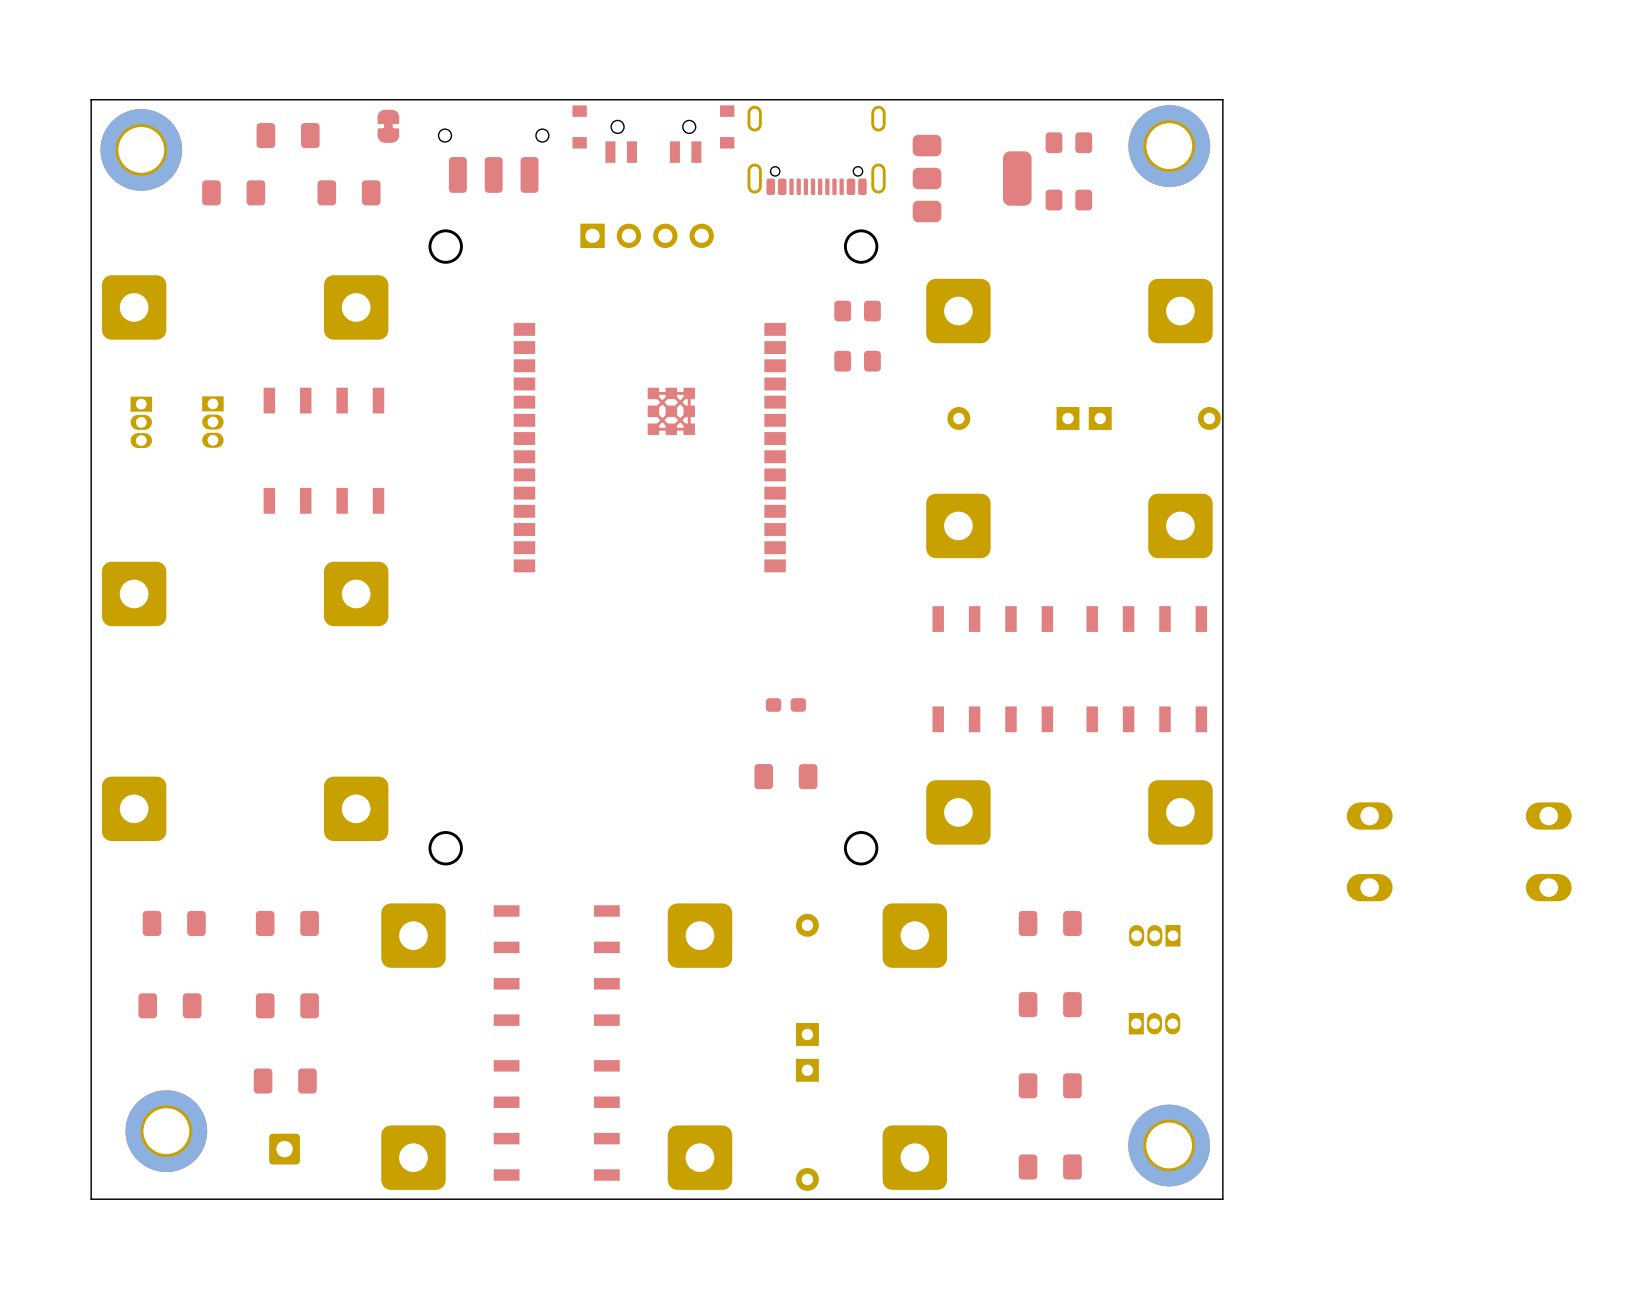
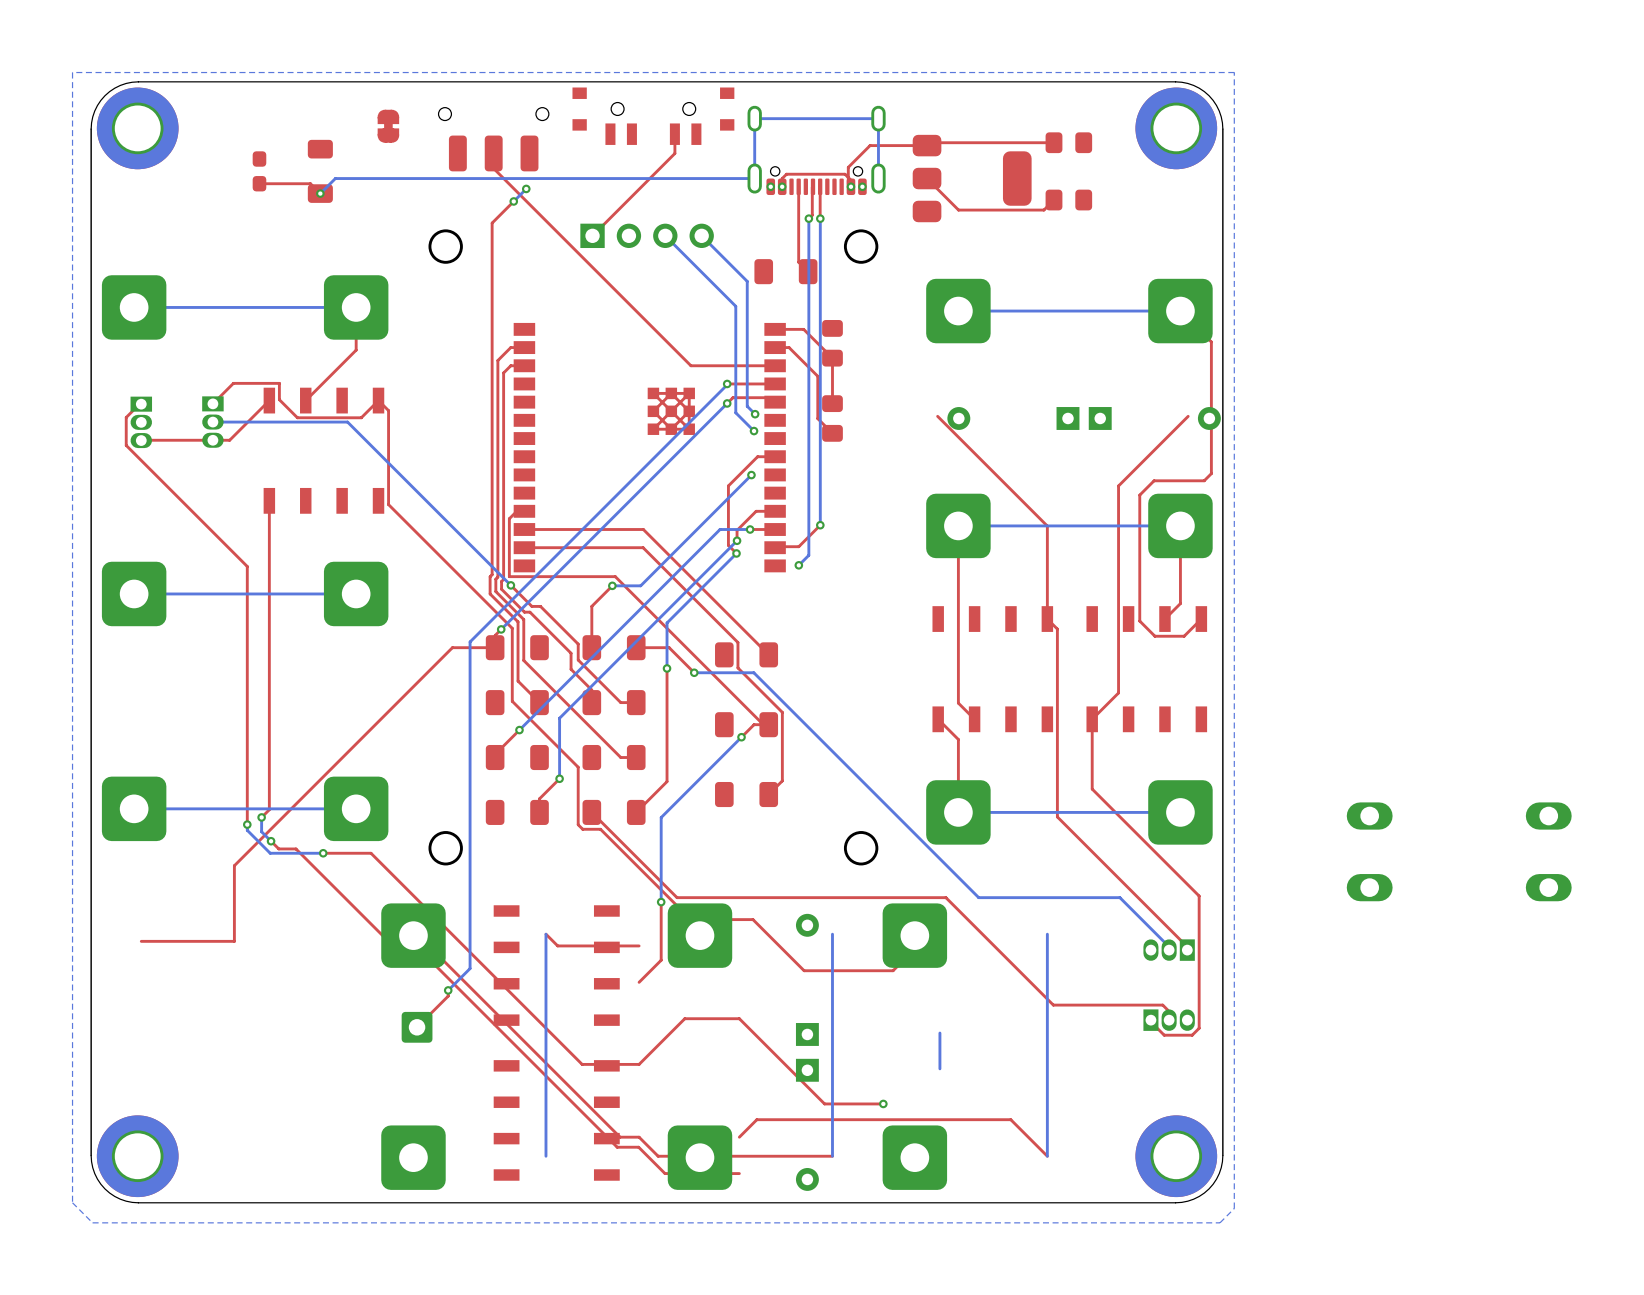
bottom zone outline: none -> (1234, 72) (72, 72) (72, 1202) (92, 1222) (1219, 1222) (1234, 1208) (1234, 72)
board edge: (1222, 129) (1222, 99) (91, 99) (91, 129) -> (1222, 129) (1219, 111) (1209, 95) (1193, 85) (1175, 81) (138, 81) (120, 85) (105, 95) (94, 111) (91, 129)
part position: (653, 134) -> (653, 116)
top track: none -> (674, 134) (674, 153) (592, 235)
part: (288, 135) -> none
top track: none -> (1053, 142) (929, 142) (927, 145) (870, 145) (848, 167) (848, 184) (850, 186) (850, 180) (844, 174) (786, 174) (782, 178) (782, 186)
part position: (1169, 146) -> (1176, 128)
part position: (141, 149) -> (137, 128)
top track: none -> (493, 153) (493, 168) (690, 365) (775, 365)
part position: (493, 160) -> (493, 139)
part: none -> (259, 171)
part: none -> (320, 171)
bottom track: none -> (878, 178) (878, 118) (754, 118) (754, 178) (335, 178) (320, 193)
top track: none -> (927, 178) (958, 210) (1043, 210) (1053, 200)
top track: none -> (259, 183) (310, 183) (320, 193)
via: none -> (770, 186)
via: none -> (782, 186)
top track: none -> (798, 186) (798, 262) (808, 271)
top track: none -> (813, 186) (812, 215) (808, 218)
top track: none -> (820, 186) (820, 218)
via: none -> (850, 186)
via: none -> (862, 186)
bottom track: none -> (526, 188) (513, 201)
via: none -> (526, 188)
part: (233, 192) -> none
part: (349, 192) -> none
via: none -> (320, 193)
top track: none -> (513, 201) (492, 223) (492, 574) (490, 576) (490, 593) (518, 621) (518, 681) (539, 702)
via: none -> (513, 201)
bottom track: none -> (808, 218) (808, 555) (798, 565)
via: none -> (808, 218)
bottom track: none -> (820, 218) (820, 525)
via: none -> (820, 218)
bottom track: none -> (665, 235) (735, 306) (735, 412) (754, 431)
bottom track: none -> (701, 235) (747, 281) (747, 406) (755, 414)
part: none -> (785, 271)
top track: none -> (356, 307) (356, 350) (305, 400)
bottom track: none -> (356, 307) (134, 307)
part: (857, 311) -> none
top track: none -> (1180, 311) (1211, 341) (1211, 473) (1204, 480) (1154, 480) (1139, 495) (1139, 621) (1154, 636) (1184, 636) (1201, 619)
bottom track: none -> (1180, 311) (958, 311)
top track: none -> (775, 329) (803, 329) (832, 358) (832, 403)
part: none -> (832, 343)
top track: none -> (524, 347) (510, 347) (497, 360) (497, 577) (495, 579) (495, 591) (523, 619) (523, 660) (620, 757) (636, 757)
top track: none -> (775, 347) (789, 347) (817, 376) (817, 418) (832, 433)
part: (857, 361) -> none
top track: none -> (524, 365) (510, 365) (503, 372) (503, 579) (501, 581) (501, 589) (524, 612) (529, 612) (571, 653) (571, 669) (591, 690) (591, 702)
bottom track: none -> (727, 383) (470, 641) (470, 968) (448, 990)
via: none -> (727, 383)
top track: none -> (775, 383) (727, 383)
top track: none -> (269, 400) (229, 440) (141, 440)
top track: none -> (775, 402) (770, 397) (732, 397) (727, 403)
top track: none -> (212, 403) (233, 383) (279, 383) (279, 399) (297, 417) (361, 417) (378, 400) (388, 410) (388, 504) (512, 628) (512, 701) (578, 767) (578, 824) (582, 829) (600, 829) (690, 919) (752, 919) (804, 970) (893, 970) (939, 923)
bottom track: none -> (727, 403) (501, 629)
via: none -> (727, 403)
top track: none -> (141, 404) (126, 417) (126, 445) (247, 566) (247, 824)
via: none -> (755, 414)
top track: none -> (937, 416) (1047, 526) (1047, 619) (1057, 629) (1057, 816) (1187, 946) (1187, 950)
top track: none -> (1188, 416) (1118, 485) (1118, 692) (1092, 719) (1092, 789) (1199, 896) (1199, 1028) (1192, 1035) (1164, 1035) (1150, 1020)
part: none -> (832, 418)
bottom track: none -> (212, 422) (347, 422) (510, 585)
via: none -> (754, 431)
top track: none -> (775, 456) (757, 456) (728, 485) (728, 545) (736, 553)
bottom track: none -> (751, 475) (640, 585) (612, 585)
via: none -> (751, 475)
top track: none -> (269, 500) (269, 809) (261, 817)
top track: none -> (524, 511) (516, 511) (509, 518) (509, 576) (615, 576) (763, 724)
top track: none -> (775, 511) (756, 511) (737, 530) (737, 540)
top track: none -> (820, 525) (798, 546) (775, 547)
via: none -> (820, 525)
top track: none -> (958, 525) (958, 703) (974, 719)
top track: none -> (1180, 525) (1180, 603) (1164, 619)
bottom track: none -> (1180, 525) (958, 525)
top track: none -> (524, 529) (643, 529) (768, 654)
bottom track: none -> (750, 529) (720, 529) (519, 730)
via: none -> (750, 529)
top track: none -> (775, 529) (750, 529)
bottom track: none -> (737, 540) (559, 718) (559, 778)
via: none -> (737, 540)
top track: none -> (524, 547) (643, 547) (737, 642) (737, 667) (782, 712) (782, 780) (768, 794)
bottom track: none -> (736, 553) (667, 622) (667, 668)
via: none -> (736, 553)
via: none -> (798, 565)
top track: none -> (510, 585) (531, 606) (540, 606) (578, 644) (578, 660) (620, 702) (636, 702)
via: none -> (510, 585)
top track: none -> (612, 585) (591, 606) (591, 647)
via: none -> (612, 585)
bottom track: none -> (356, 593) (134, 593)
top track: none -> (501, 629) (495, 635) (495, 647) (452, 647) (234, 865) (234, 941) (141, 941)
via: none -> (501, 629)
part: none -> (517, 647)
part: none -> (614, 647)
top track: none -> (636, 647) (669, 647) (694, 672)
part: none -> (746, 654)
top track: none -> (667, 668) (667, 781) (636, 812)
via: none -> (667, 668)
bottom track: none -> (694, 672) (753, 672) (978, 897) (1119, 897) (1169, 946) (1169, 950)
via: none -> (694, 672)
part: none -> (517, 702)
part: none -> (614, 702)
part: (785, 704) -> none
top track: none -> (938, 719) (958, 739) (958, 812)
part: none -> (746, 724)
top track: none -> (768, 724) (754, 724) (741, 737)
top track: none -> (519, 730) (495, 754) (495, 757)
via: none -> (519, 730)
bottom track: none -> (741, 737) (661, 817) (661, 902)
via: none -> (741, 737)
part: none -> (517, 757)
part: none -> (614, 757)
part: (785, 776) -> none
top track: none -> (559, 778) (539, 798) (539, 812)
via: none -> (559, 778)
part: none -> (746, 794)
bottom track: none -> (356, 808) (134, 808)
part: none -> (517, 812)
top track: none -> (591, 812) (677, 897) (945, 897) (1053, 1005) (1162, 1005) (1169, 1011) (1169, 1020)
part: none -> (614, 812)
bottom track: none -> (1180, 812) (958, 812)
bottom track: none -> (261, 817) (261, 831) (271, 841)
via: none -> (261, 817)
bottom track: none -> (247, 824) (247, 830) (270, 853) (323, 853)
via: none -> (247, 824)
top track: none -> (271, 841) (278, 848) (296, 848) (407, 959) (429, 959) (617, 1147) (638, 1147) (665, 1173) (739, 1173)
via: none -> (271, 841)
top track: none -> (323, 853) (371, 853) (582, 1064) (639, 1064) (684, 1018) (739, 1018) (824, 1103) (883, 1103)
via: none -> (323, 853)
top track: none -> (661, 902) (661, 960) (639, 982)
via: none -> (661, 902)
part: (174, 923) -> none
part: (287, 923) -> none
part: (1050, 923) -> none
top track: none -> (417, 934) (620, 1137) (639, 1137) (658, 1156) (832, 1156)
top track: none -> (545, 934) (557, 945) (639, 945)
bottom track: none -> (545, 934) (545, 1156)
bottom track: none -> (832, 934) (832, 1156)
bottom track: none -> (1047, 934) (1047, 1156)
part position: (1154, 935) -> (1169, 950)
top track: none -> (448, 990) (448, 996) (417, 1027)
via: none -> (448, 990)
part: (1050, 1004) -> none
part: (169, 1005) -> none
part: (287, 1005) -> none
part position: (1154, 1023) -> (1169, 1020)
part: none -> (417, 1027)
bottom track: none -> (939, 1033) (939, 1068)
part: (285, 1081) -> none
part: (1050, 1085) -> none
via: none -> (883, 1103)
part position: (166, 1131) -> (137, 1156)
top track: none -> (739, 1137) (756, 1119) (1010, 1119) (1047, 1156)
part position: (1169, 1145) -> (1176, 1156)
part: (284, 1149) -> none
board edge: (1222, 1155) (1222, 1199) (91, 1199) (91, 1155) -> (1222, 1155) (1219, 1173) (1209, 1188) (1193, 1199) (1175, 1202) (138, 1202) (120, 1199) (105, 1188) (94, 1173) (91, 1155)
part: (1050, 1166) -> none

